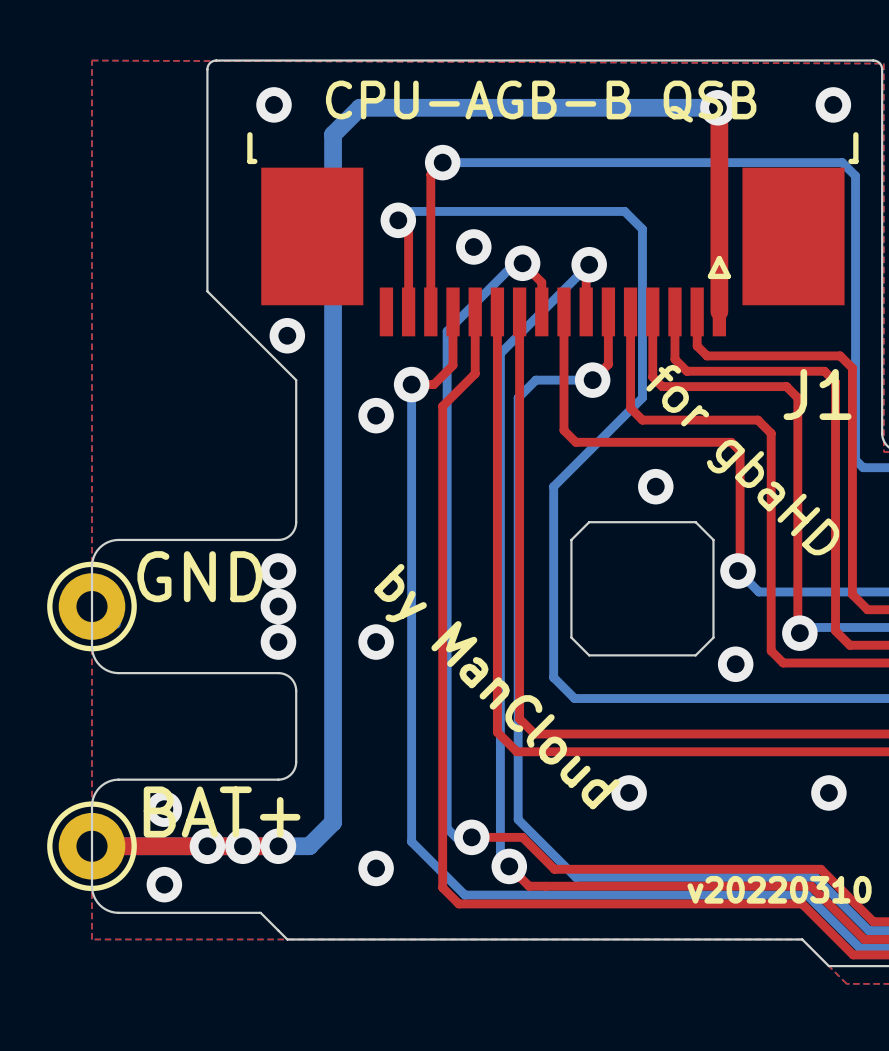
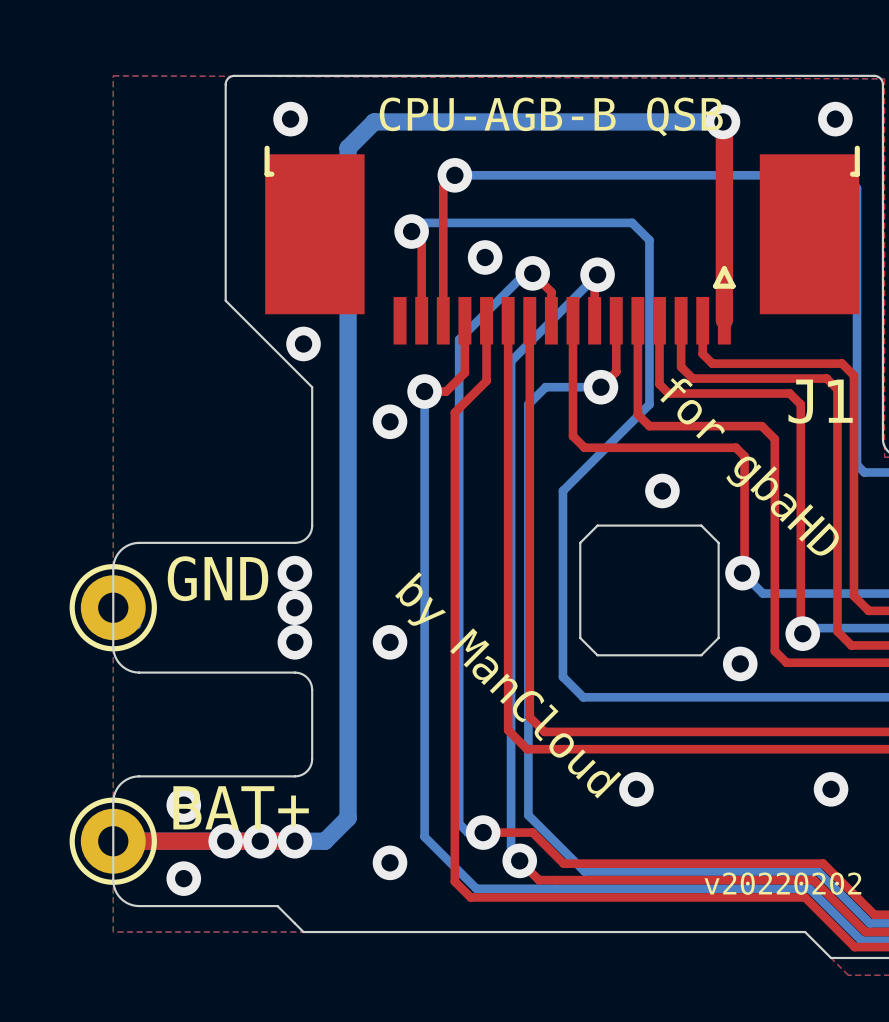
J1 footprint: [247, 132, 859, 337] -> [264, 145, 860, 345]
text: v20220310 (779, 889) -> v20220202 (782, 883)

